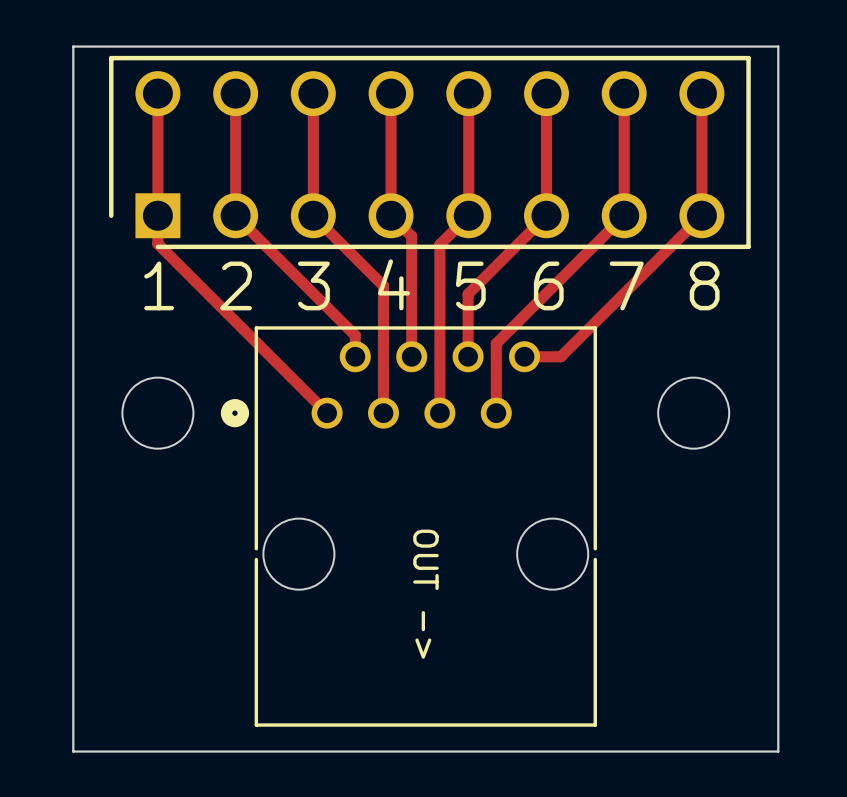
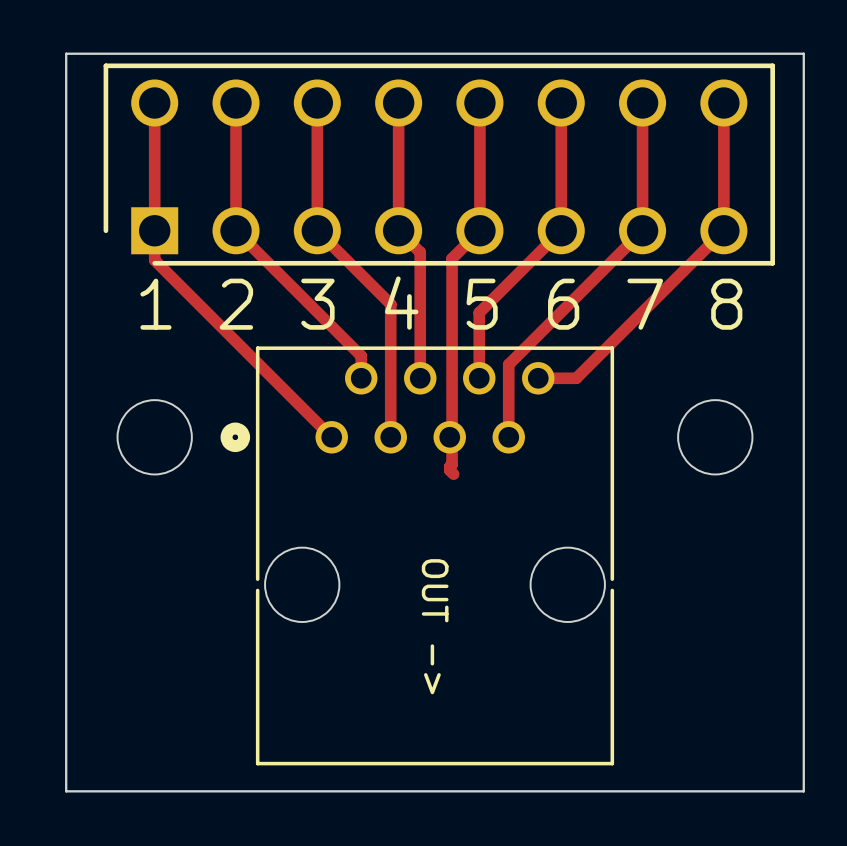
track: (442, 242) (439, 244) (439, 413) -> (452, 258) (452, 464) (449, 470) (453, 474)

